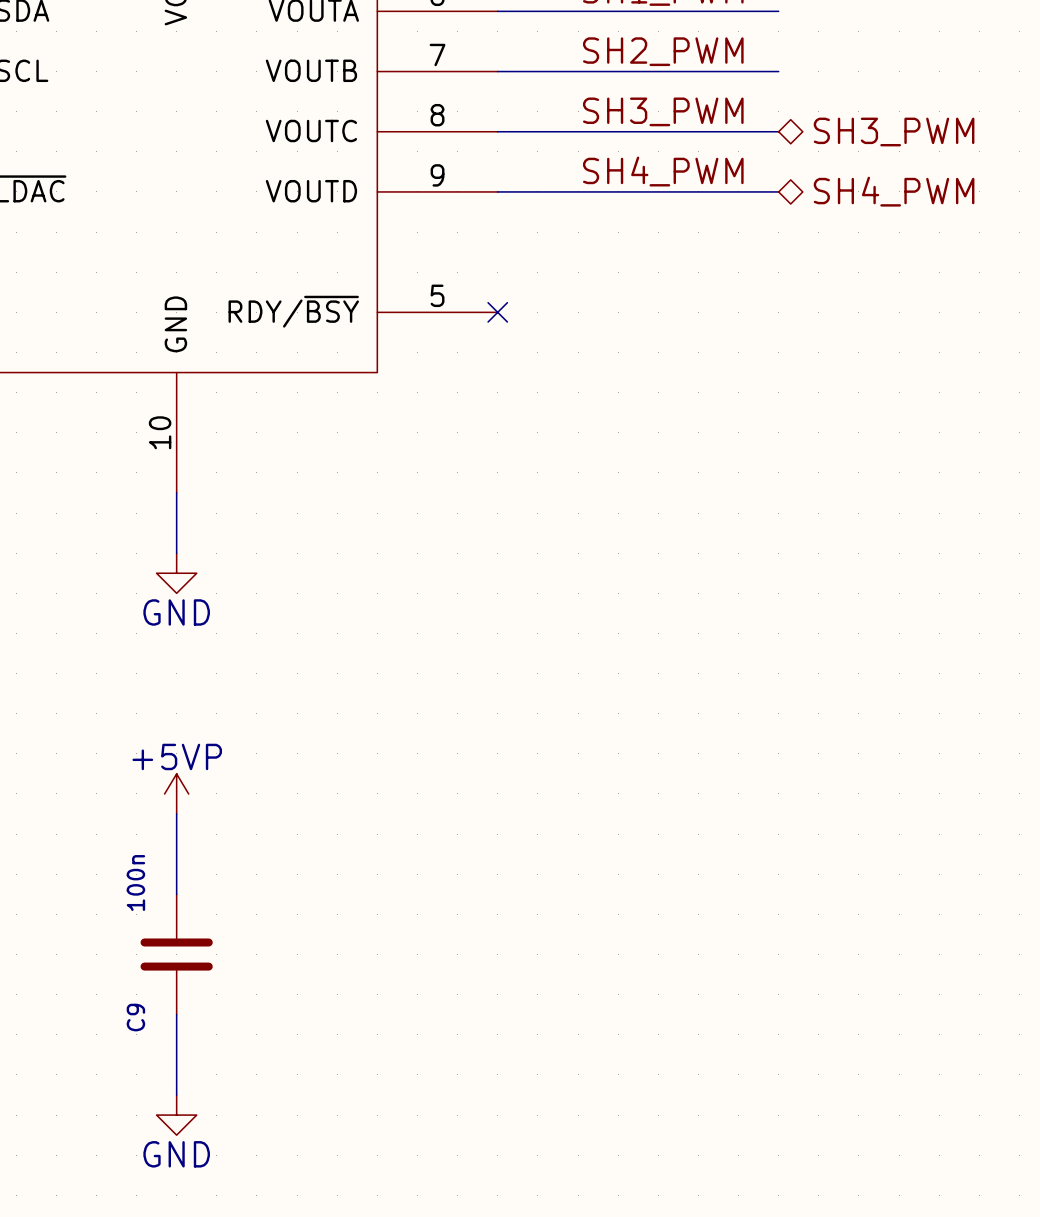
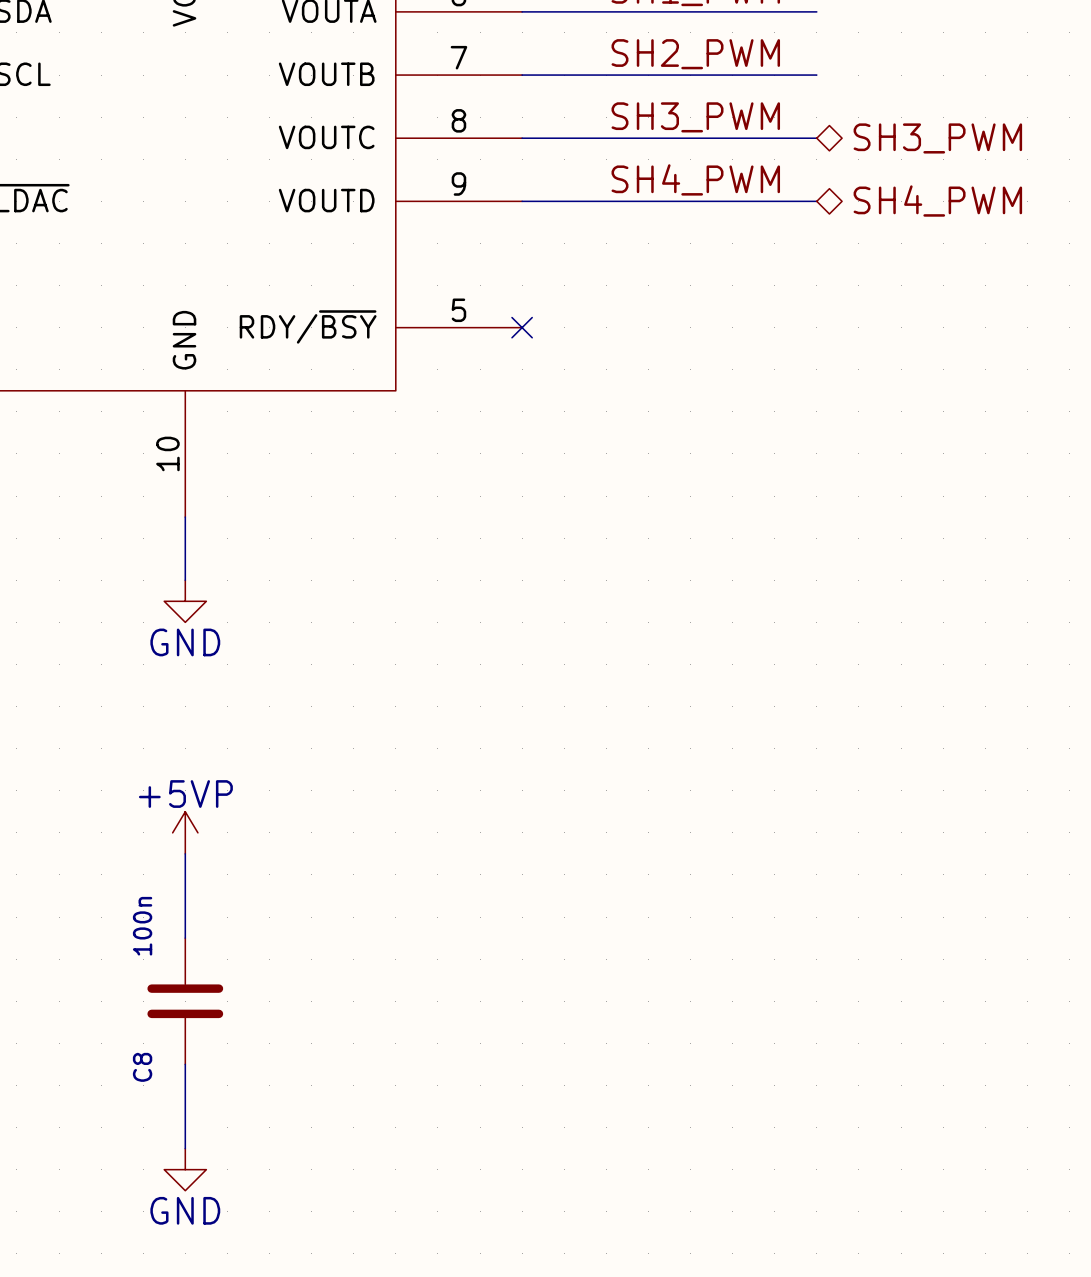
C9 name: C9 (135, 1017) -> C8 (142, 1067)

